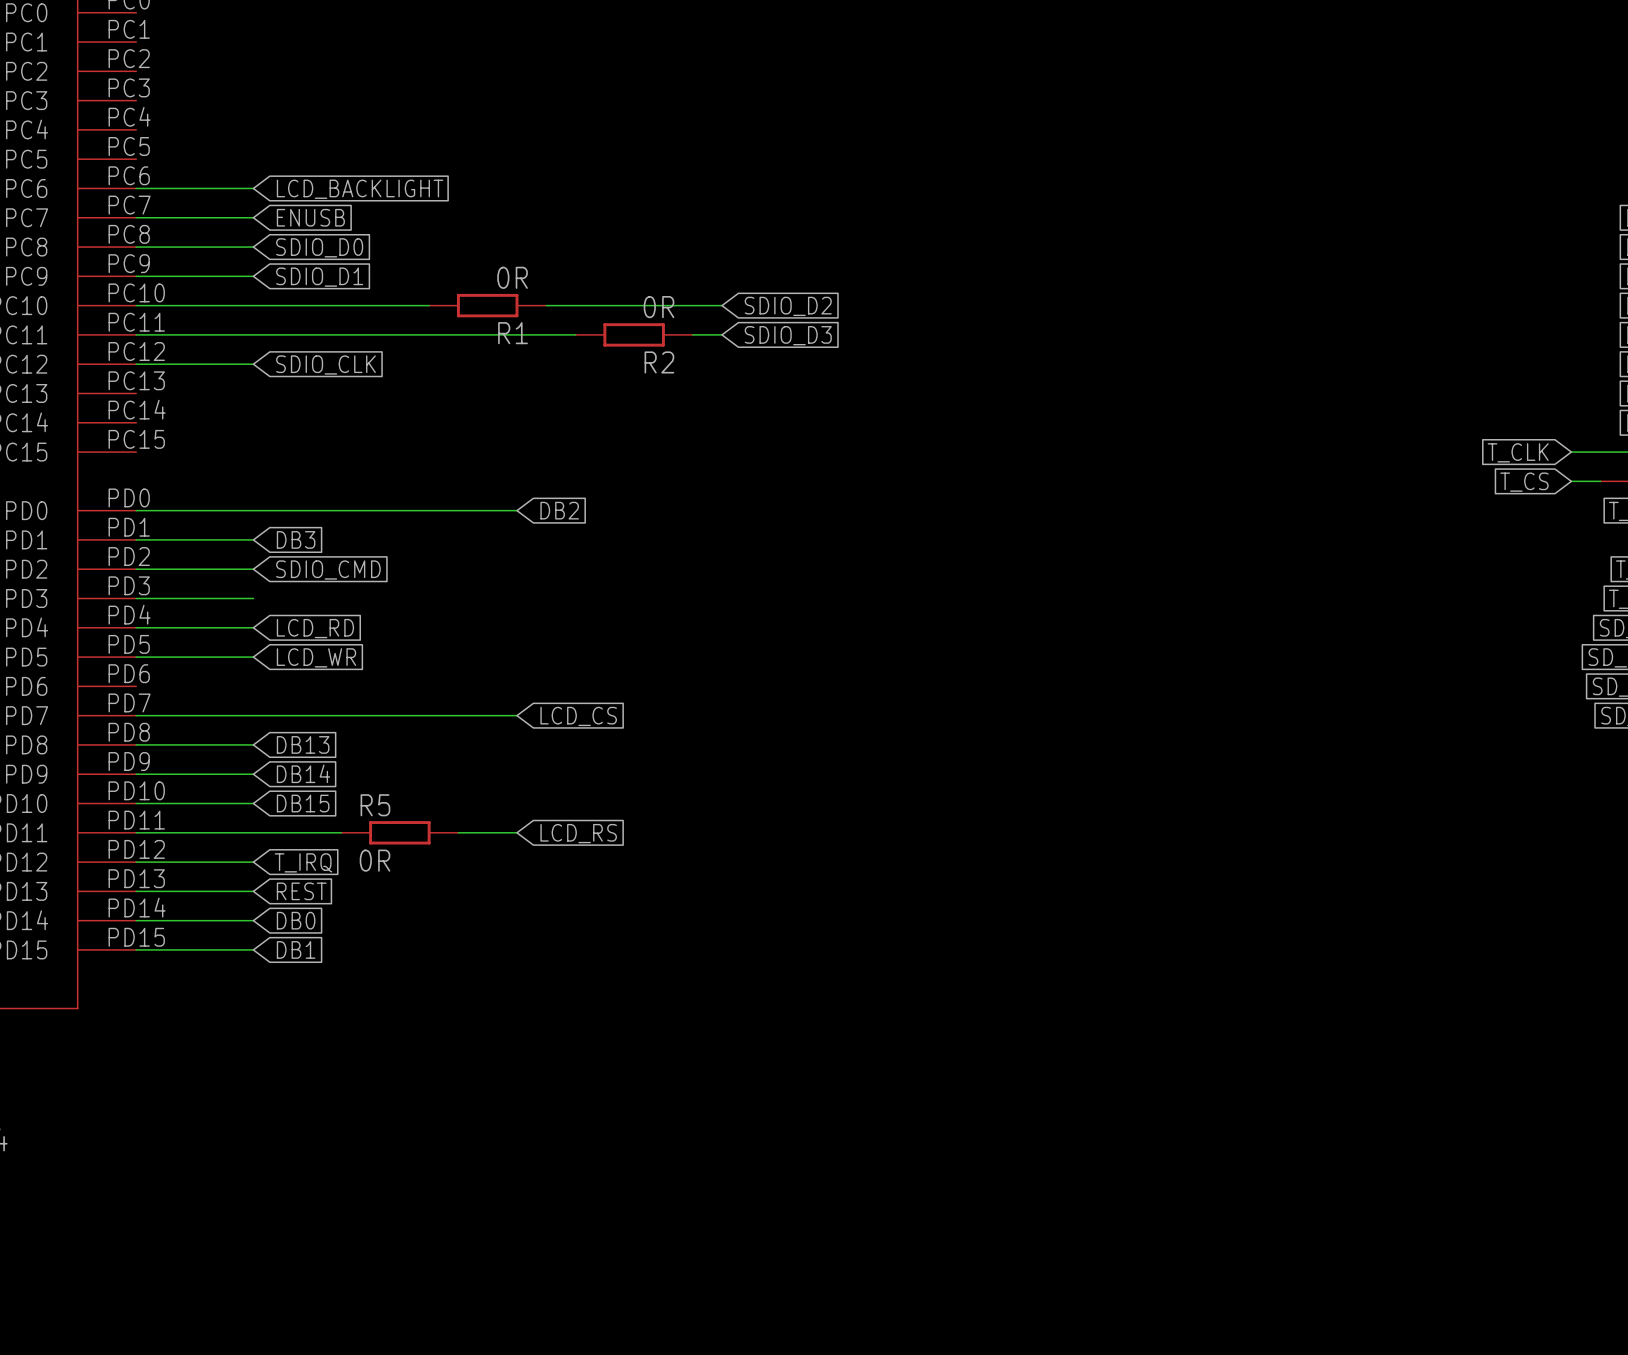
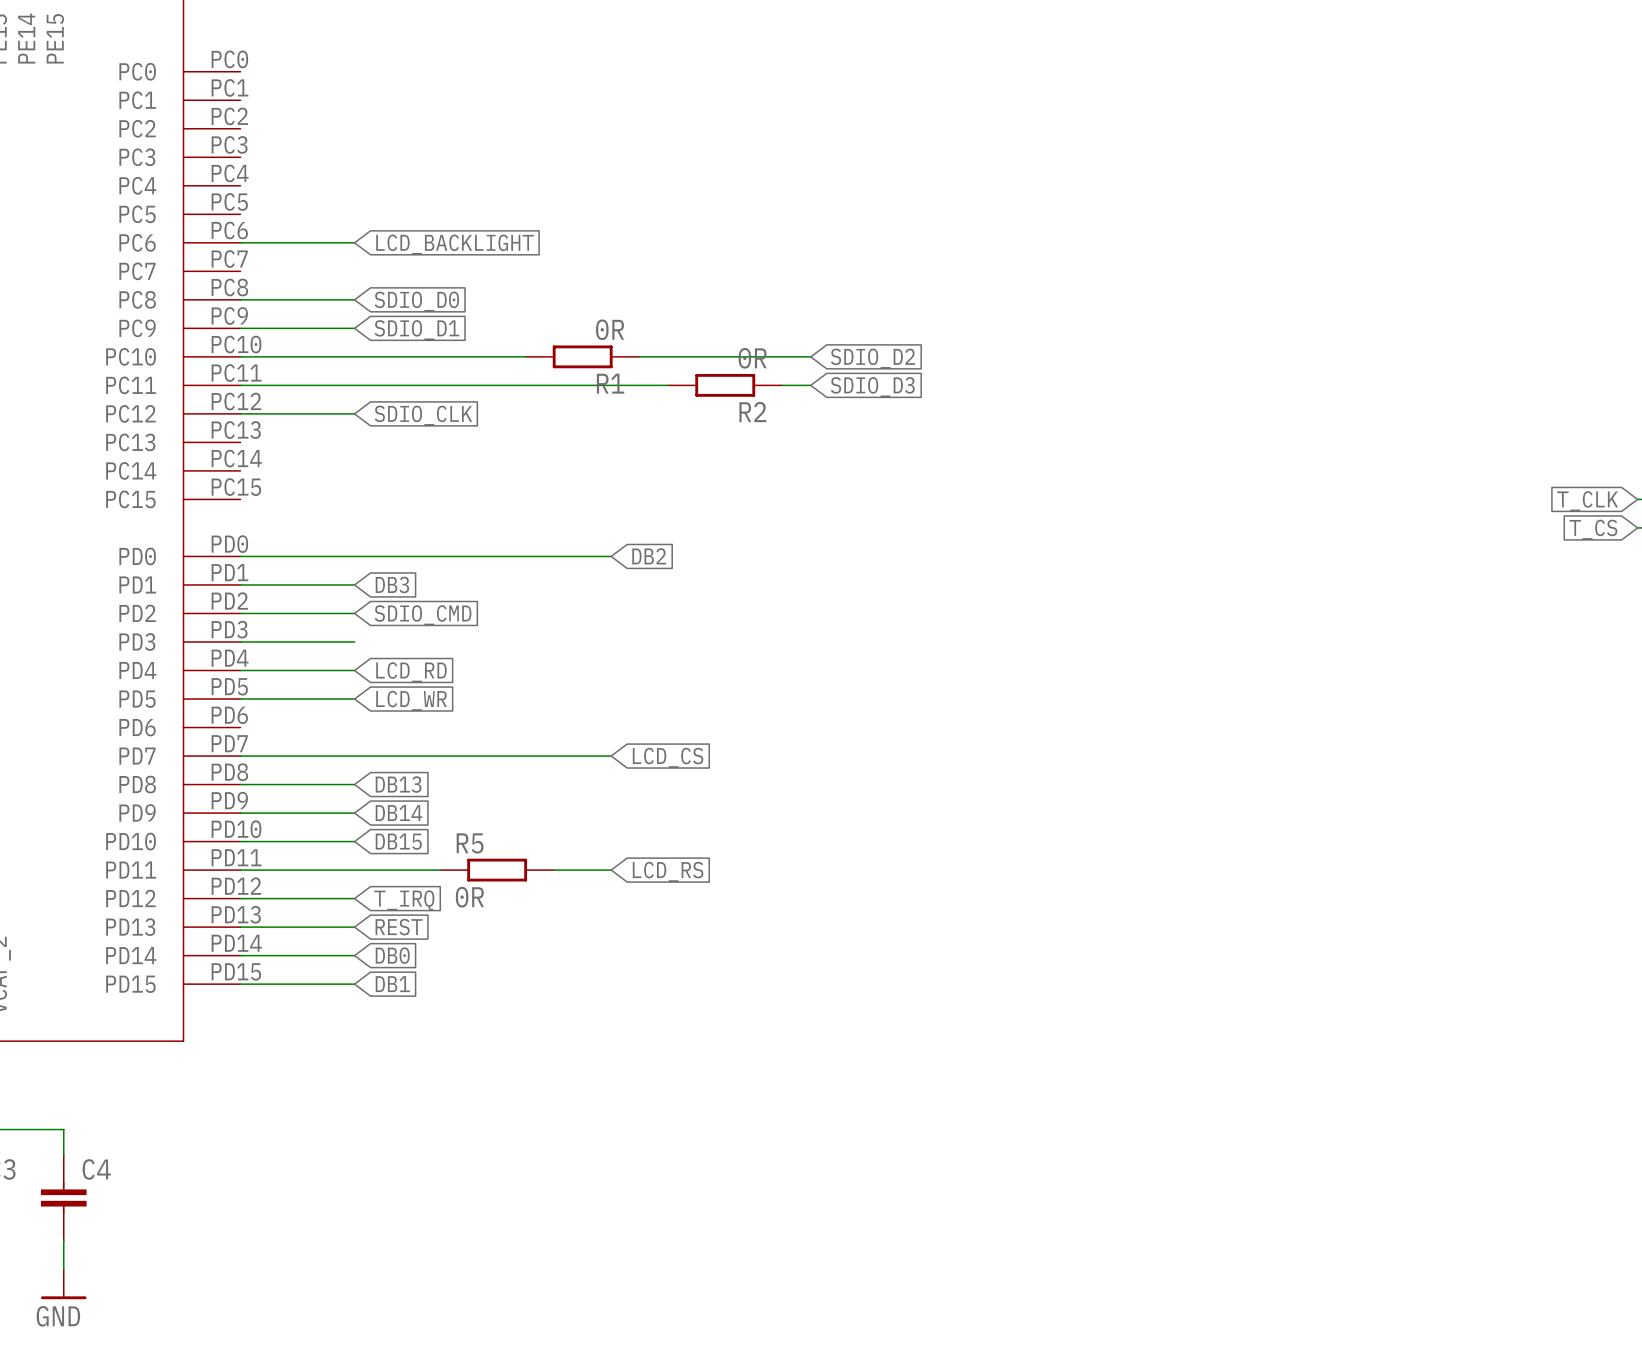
wire: (136, 217) (253, 217) -> none
global label: ENUSB (310, 217) -> none

